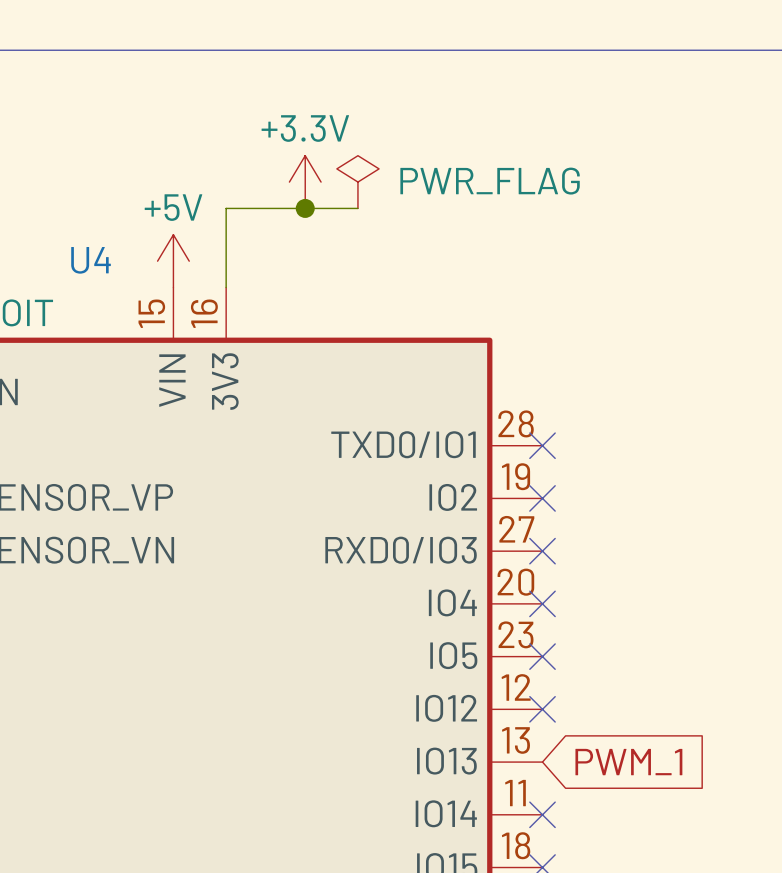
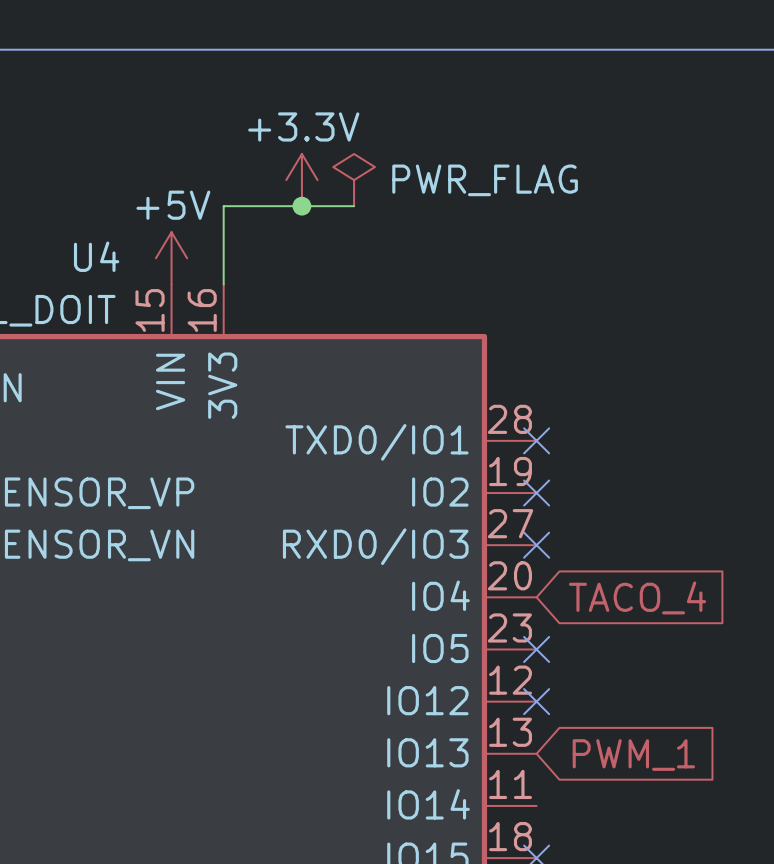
no-connect mark: (542, 603) -> none
global label: none -> TACO_4 (637, 597)
no-connect mark: (542, 814) -> none

